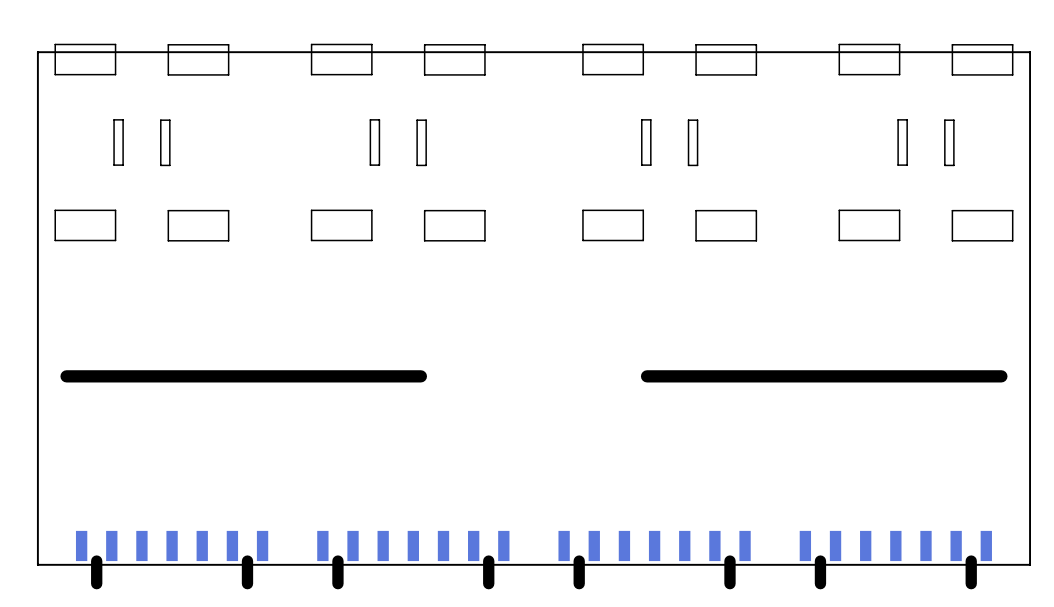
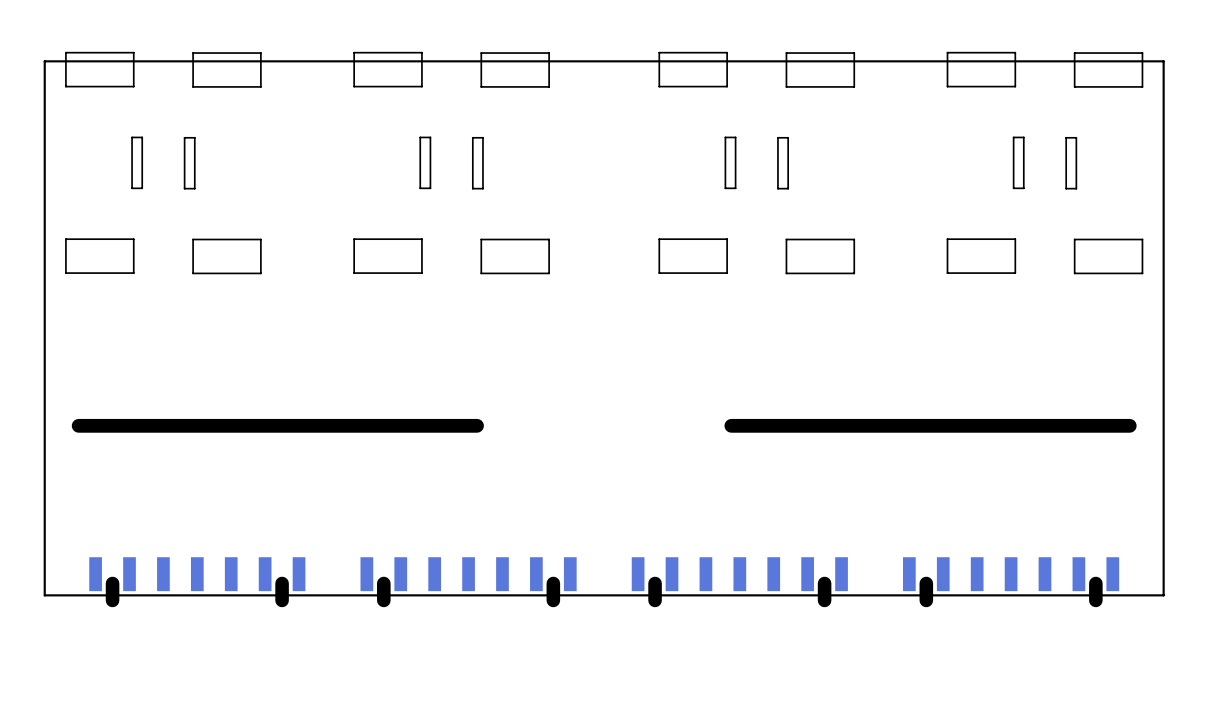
board edge: (1030, 52) (1030, 564) (37, 564) (37, 52) -> (1161, 61) (1163, 61) (1163, 595) (44, 595) (44, 61) (46, 61)
part: none -> (197, 582)
part: none -> (468, 582)
part: none -> (739, 582)
part: none -> (1011, 582)
part: (172, 545) -> none
part: (413, 545) -> none
part: (654, 545) -> none
part: (895, 545) -> none
board edge: (96, 561) (96, 583) -> none
board edge: (247, 561) (247, 583) -> none
board edge: (337, 561) (337, 583) -> none
board edge: (488, 561) (488, 583) -> none
board edge: (579, 561) (579, 583) -> none
board edge: (729, 561) (729, 583) -> none
board edge: (820, 561) (820, 583) -> none
board edge: (971, 561) (971, 583) -> none

